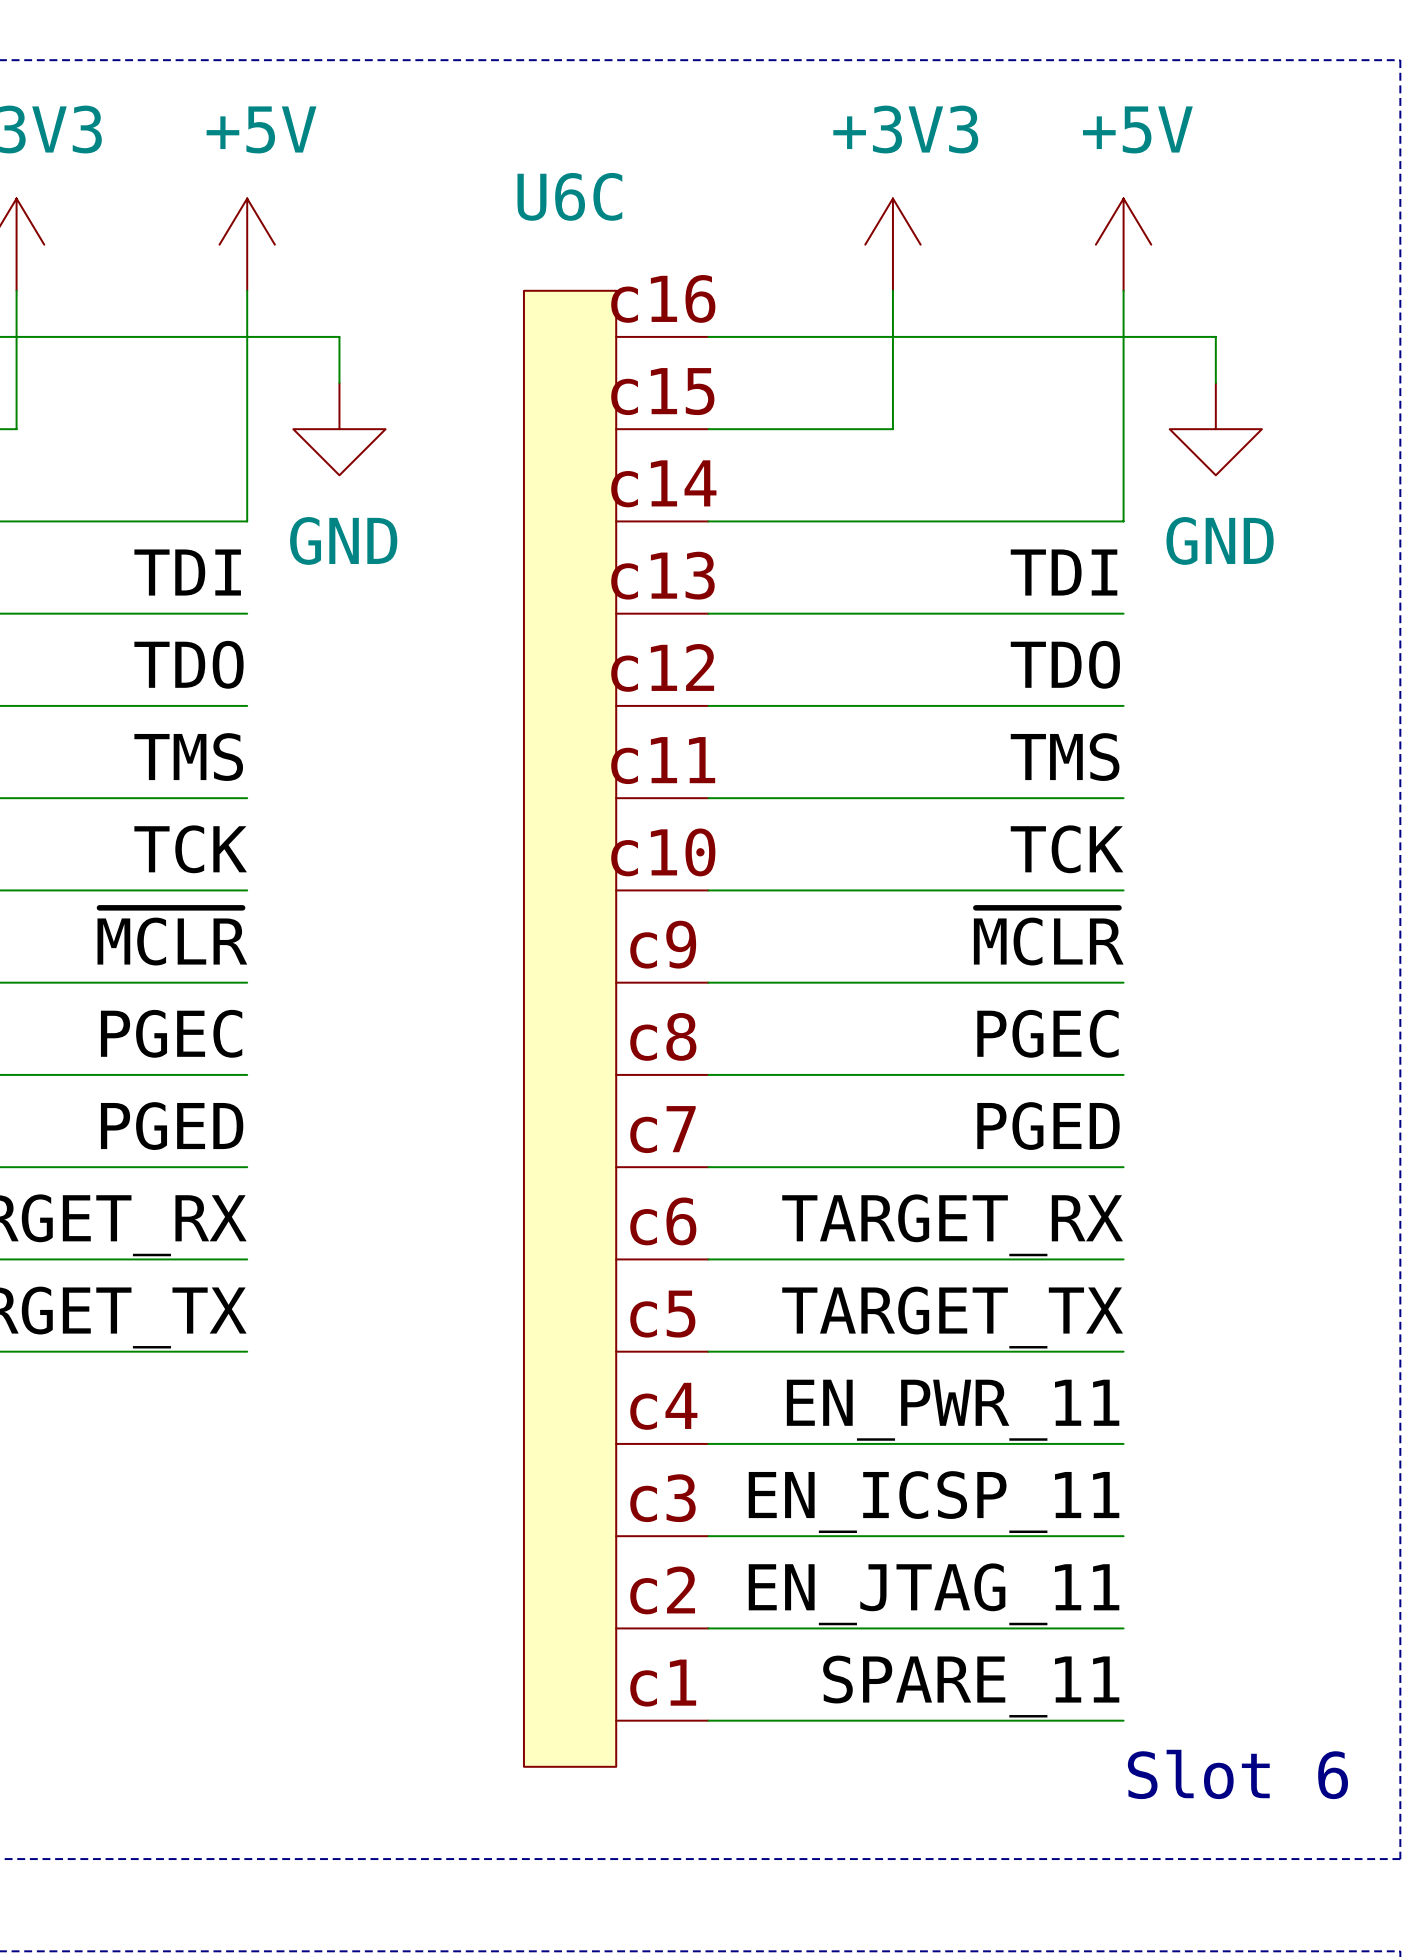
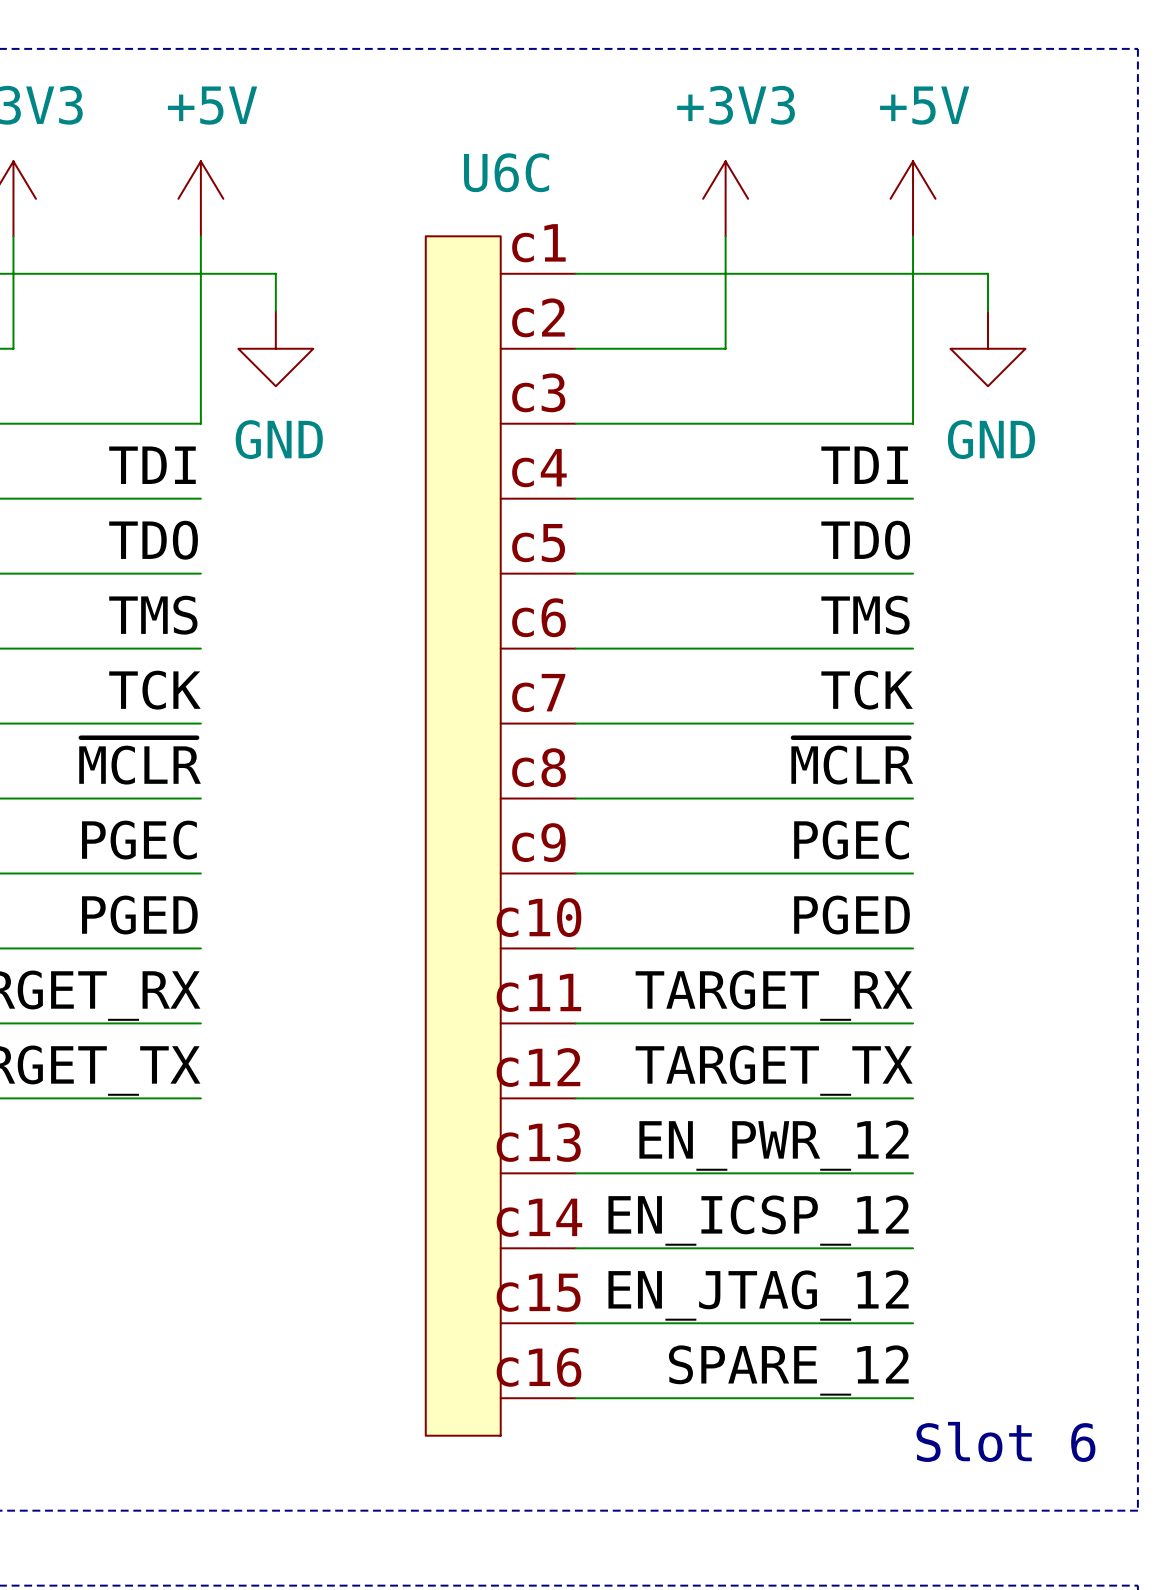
U6C flip: as is (570, 1028) -> up-down (463, 836)
label: EN_PWR_11 (953, 1410) -> EN_PWR_12 (774, 1145)
label: EN_ICSP_11 (934, 1502) -> EN_ICSP_12 (758, 1220)
label: EN_JTAG_11 (934, 1594) -> EN_JTAG_12 (758, 1295)
label: SPARE_11 (971, 1686) -> SPARE_12 (788, 1370)

